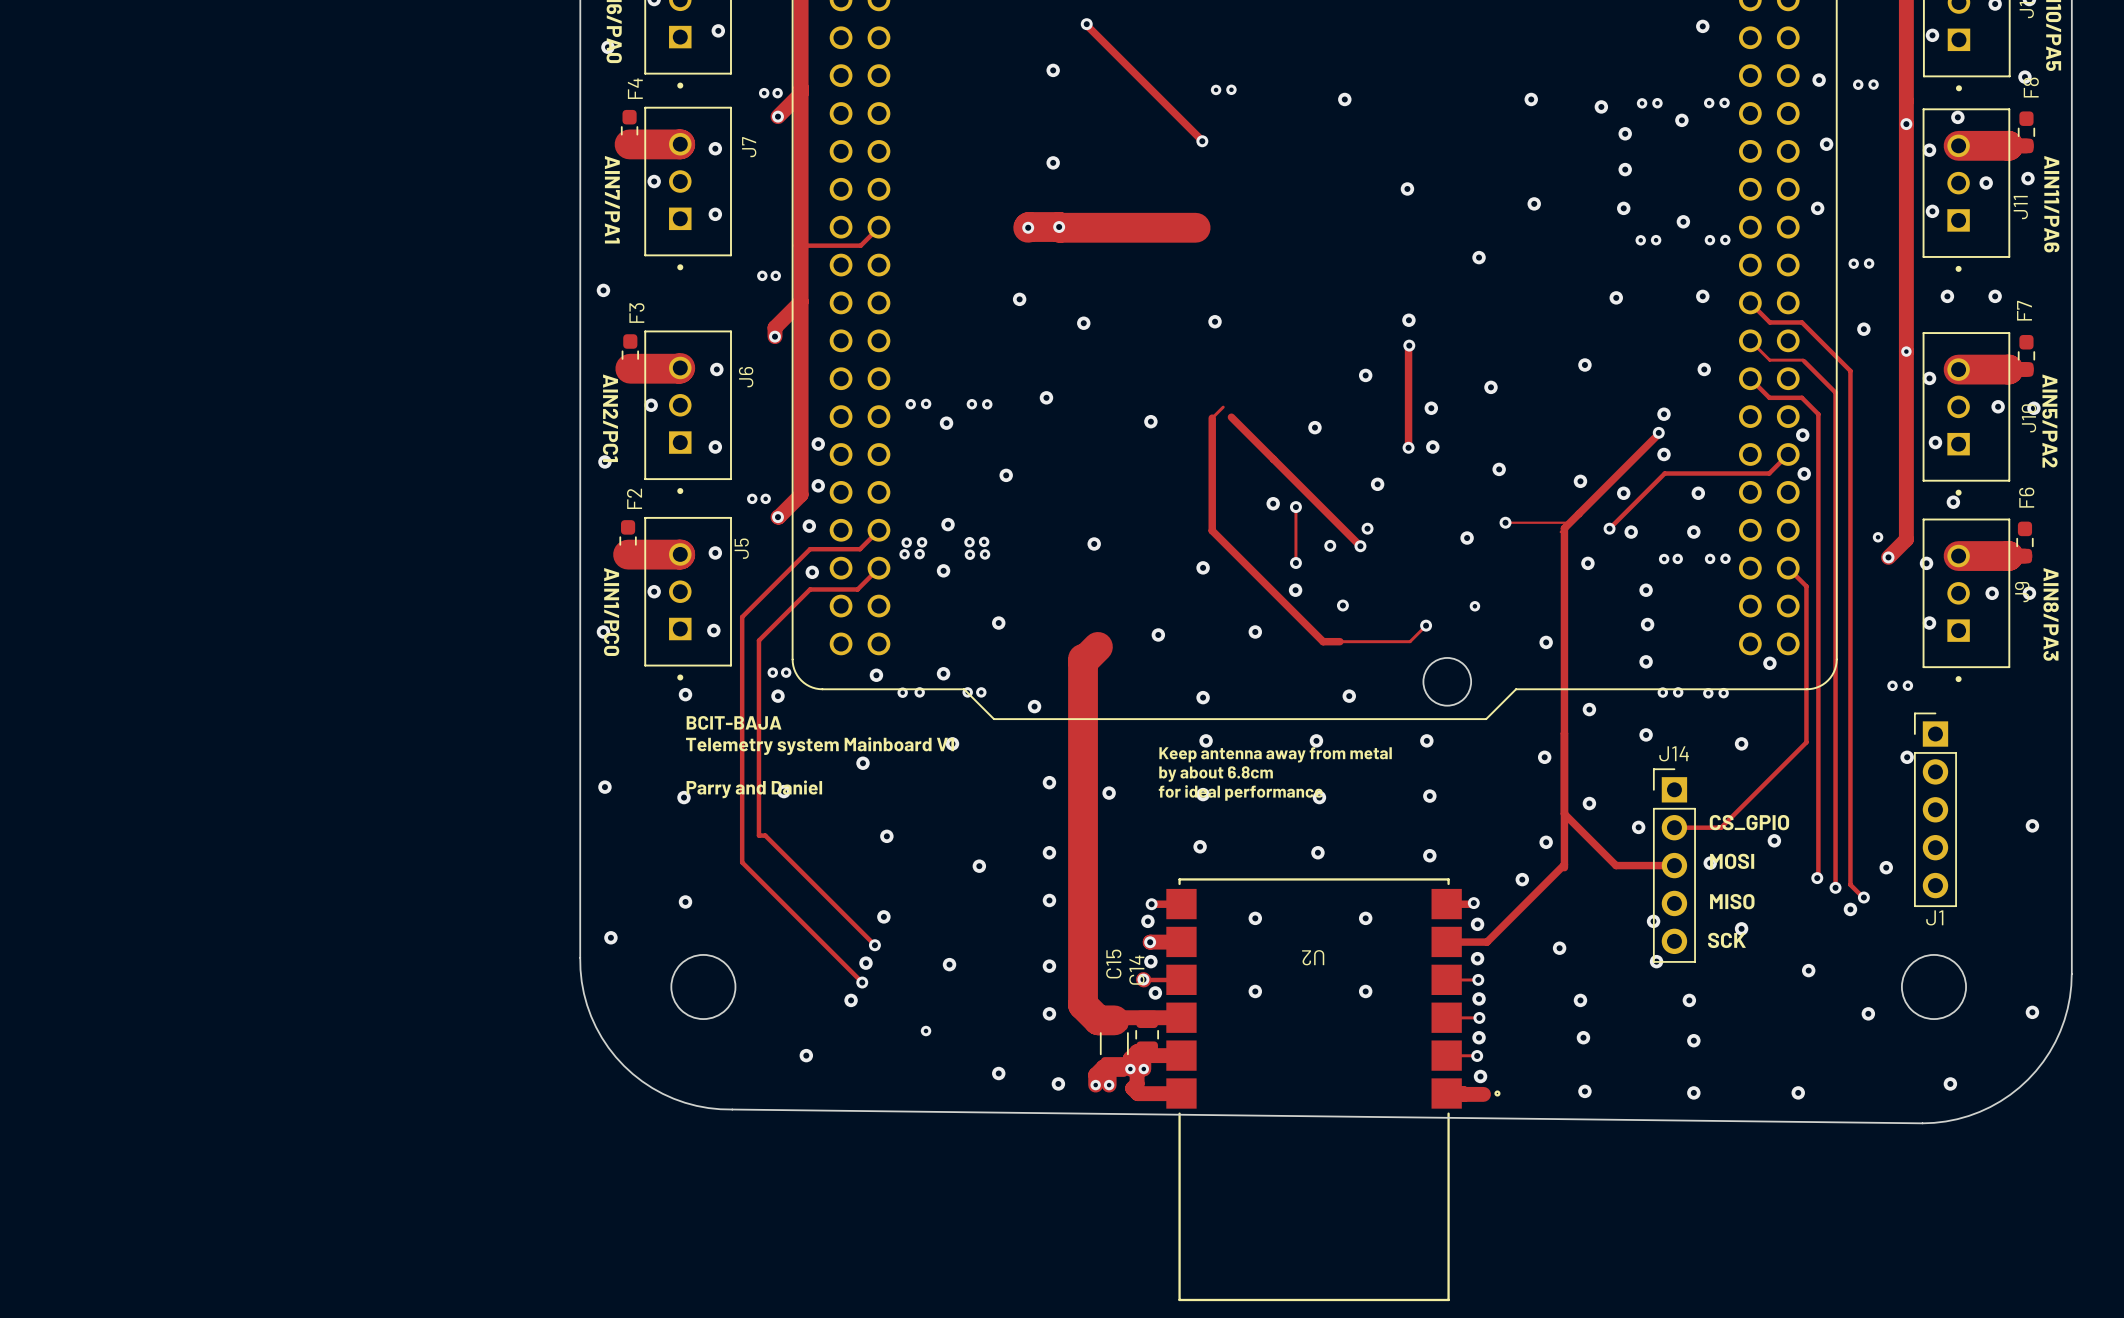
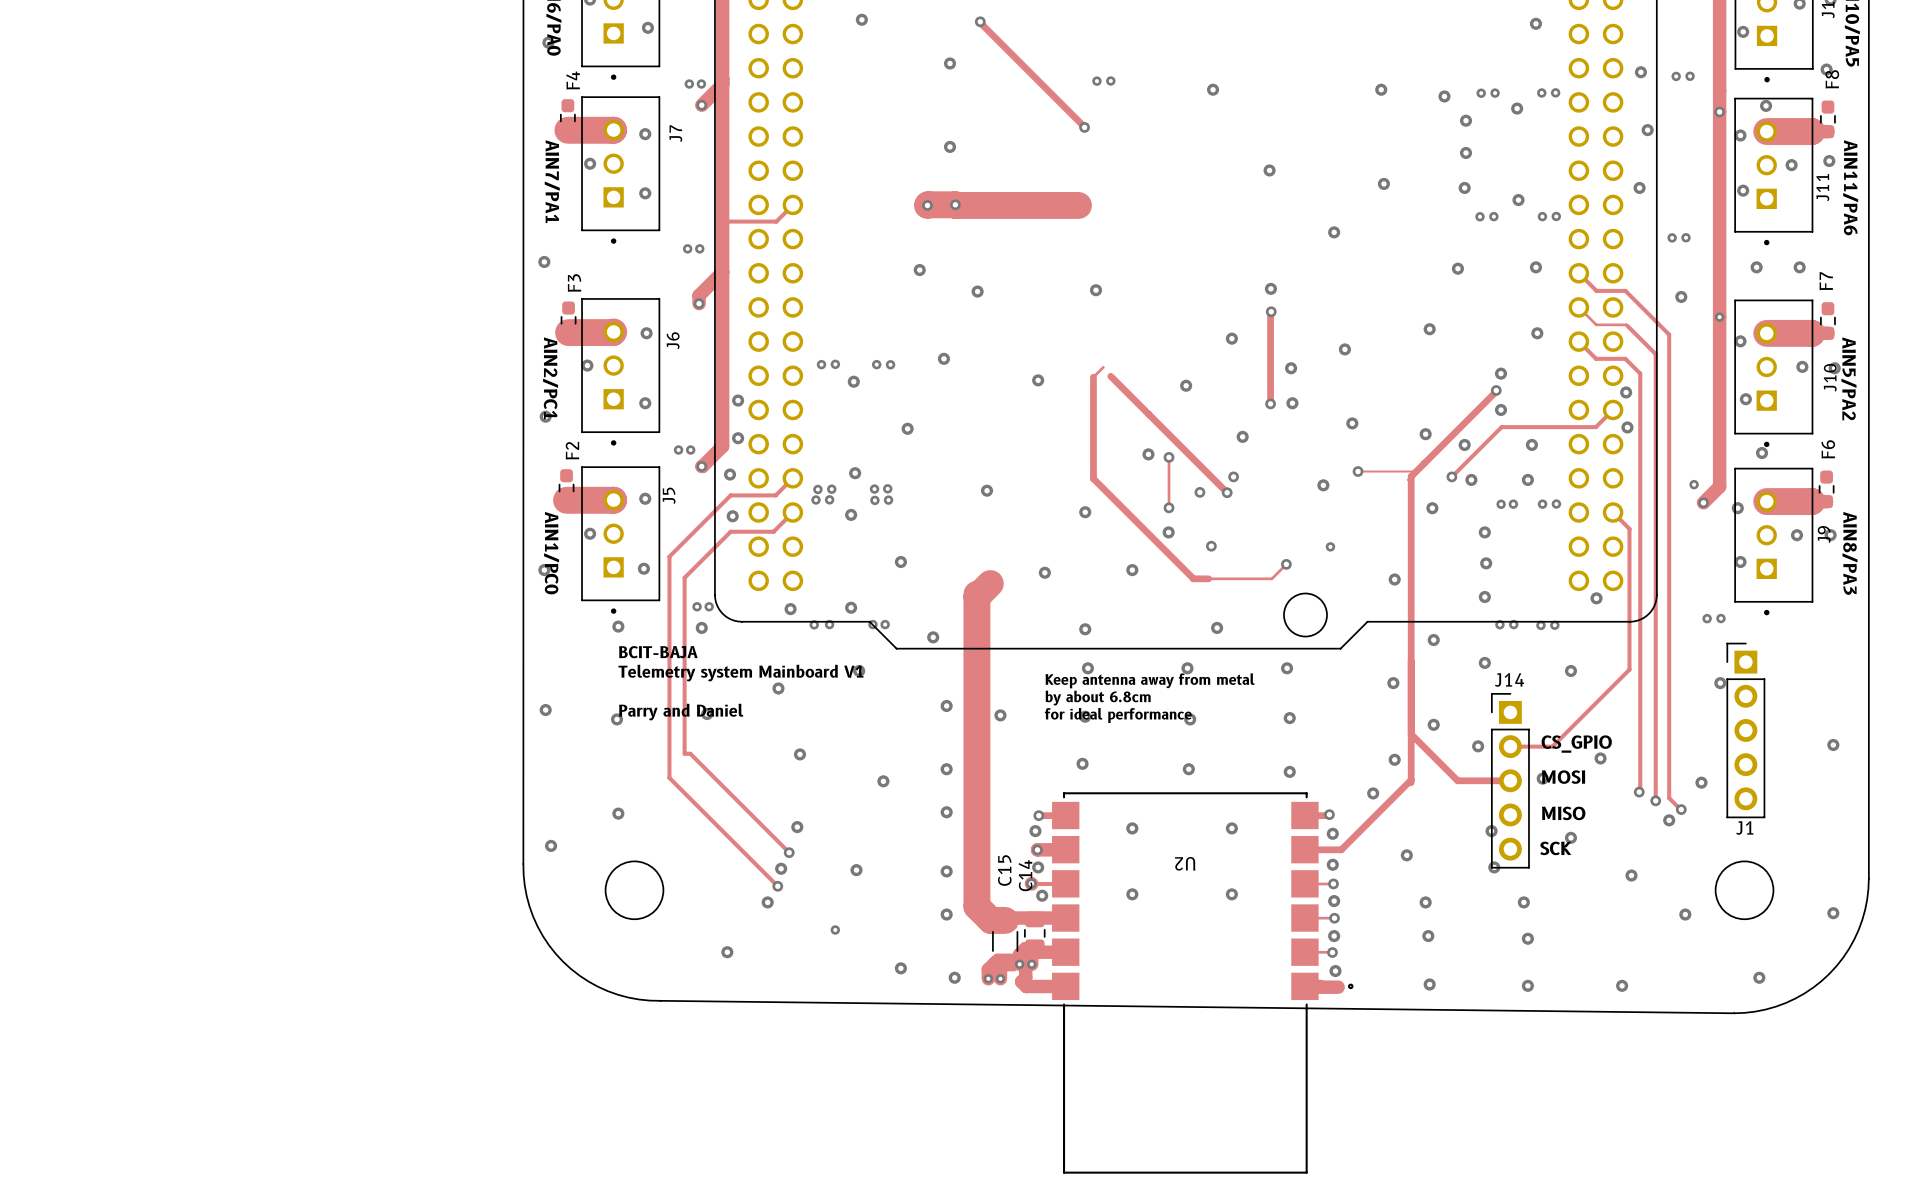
via: none -> (861, 19)

